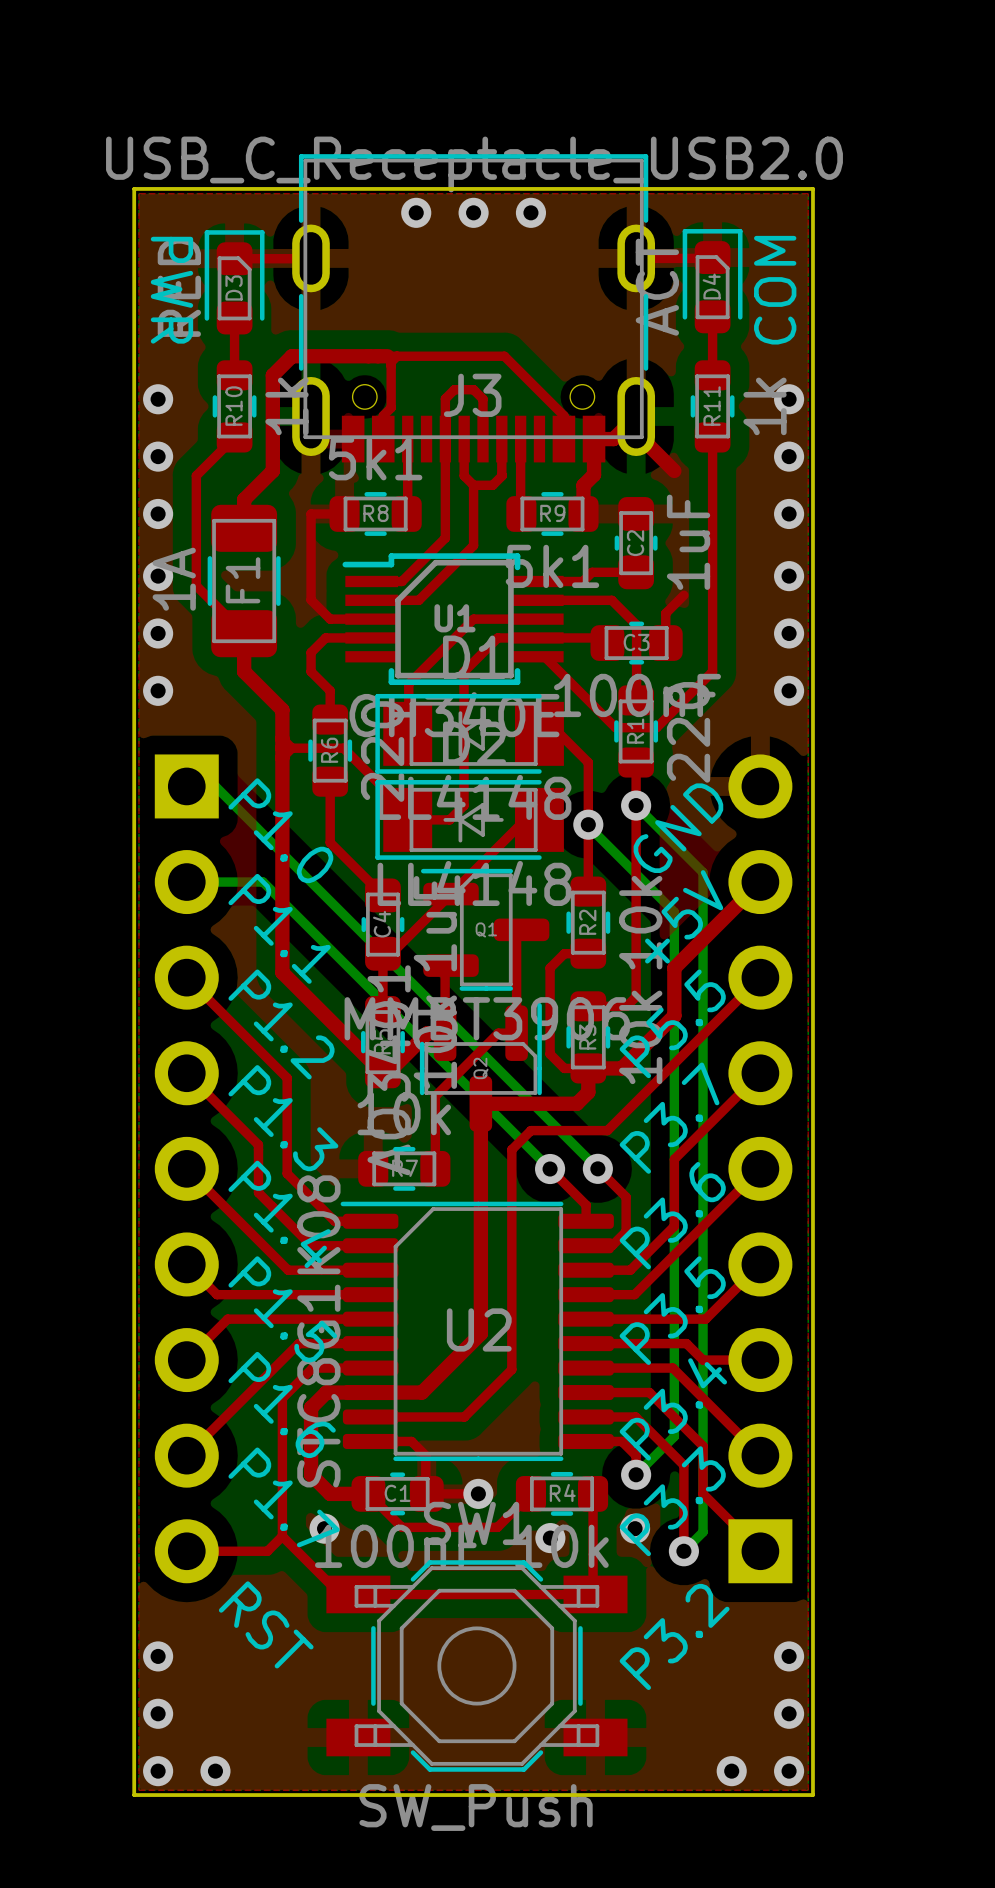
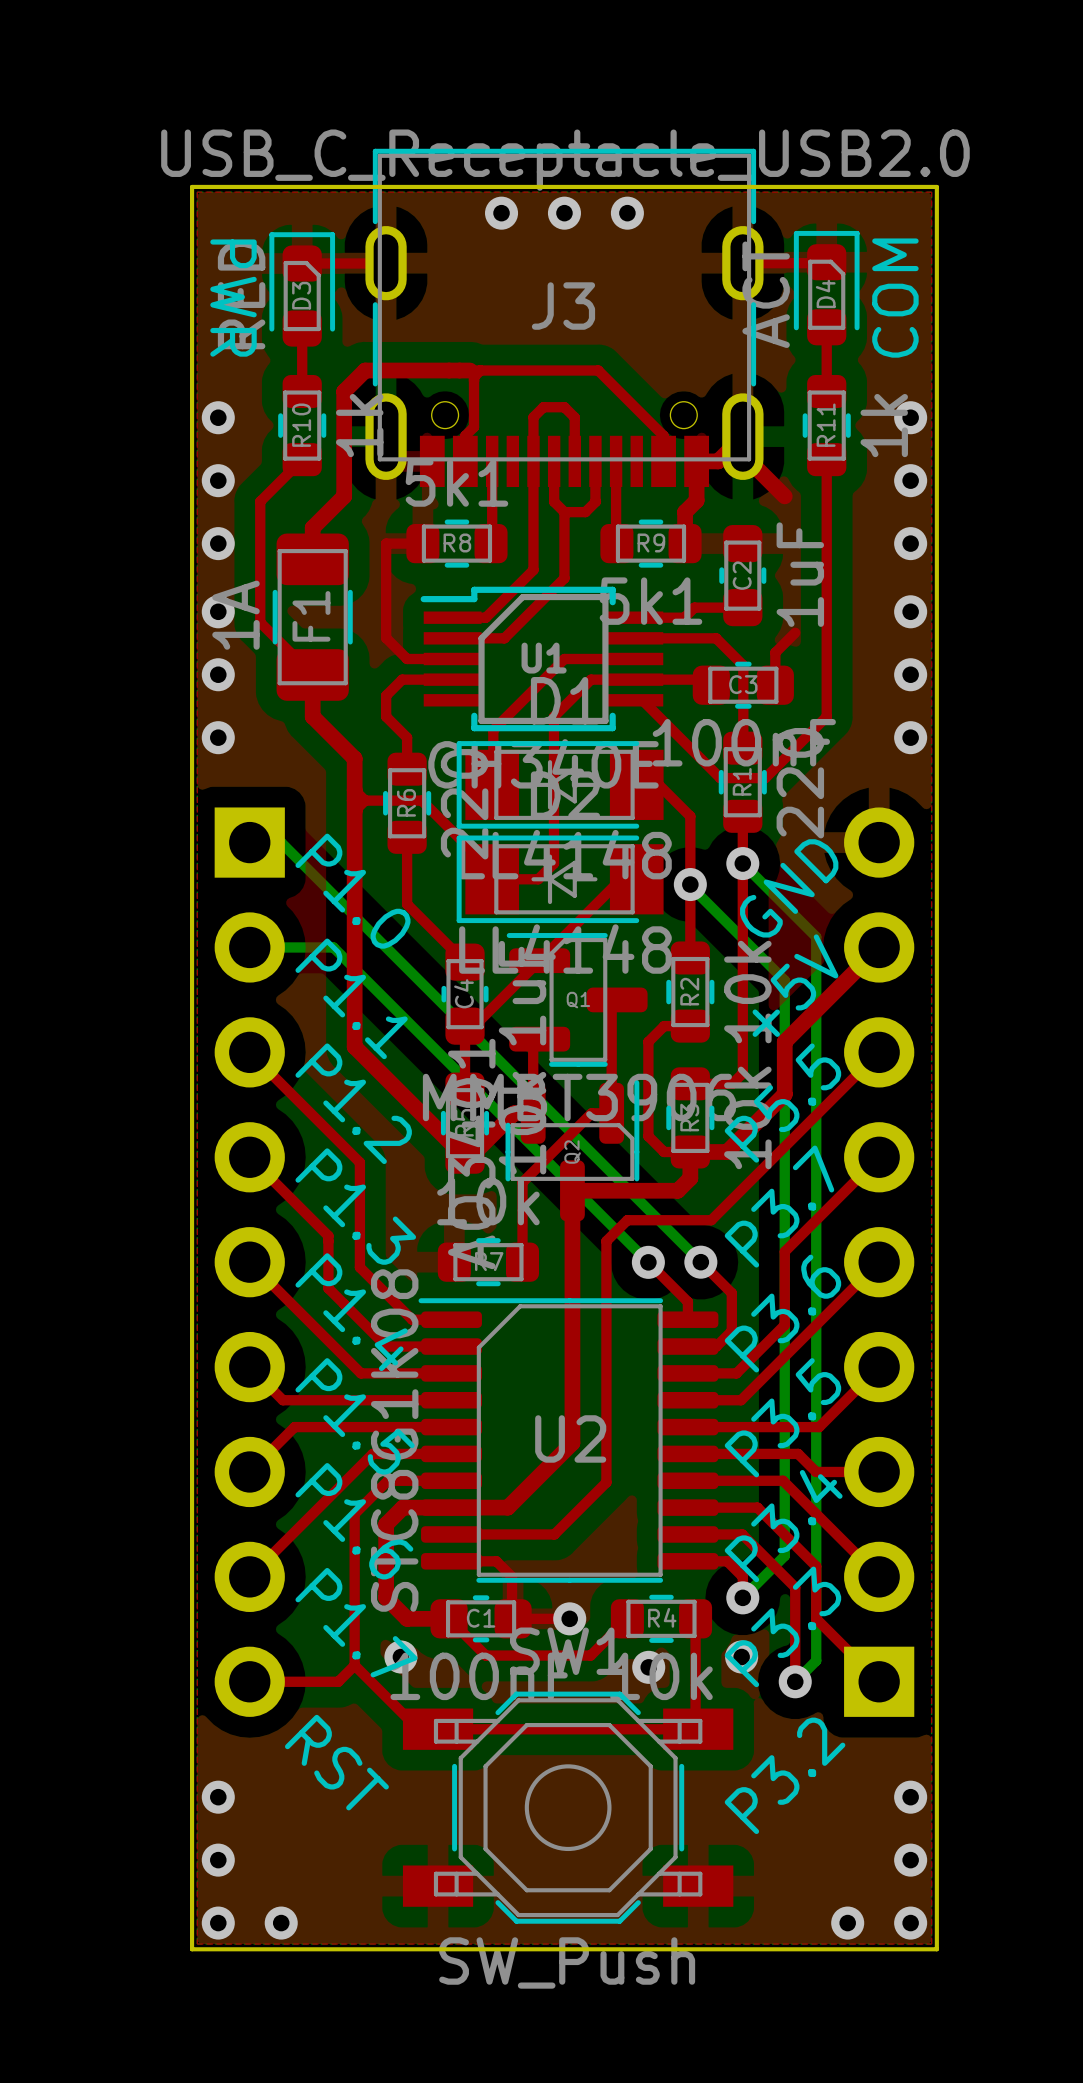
J3 name position: J3 (472, 395) -> J3 (563, 306)

